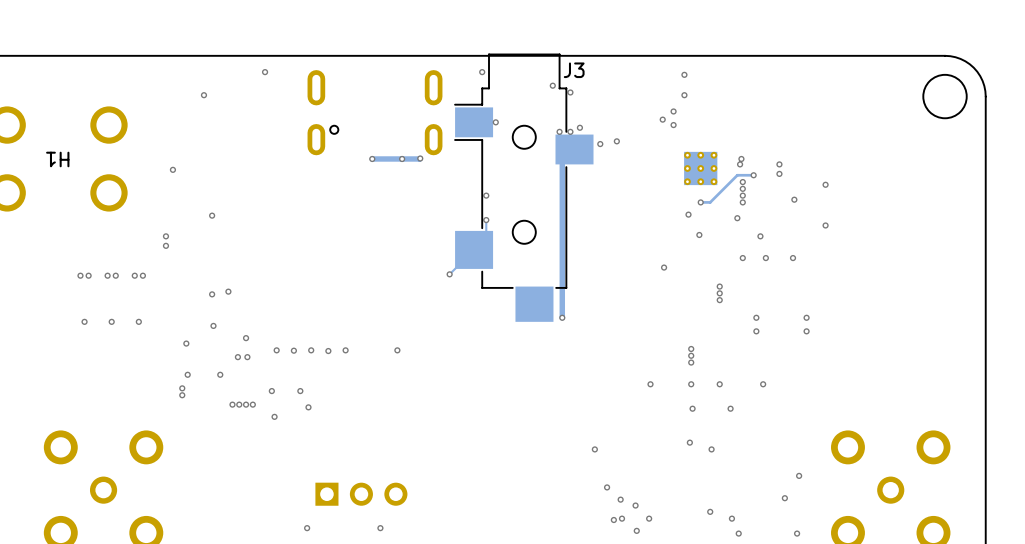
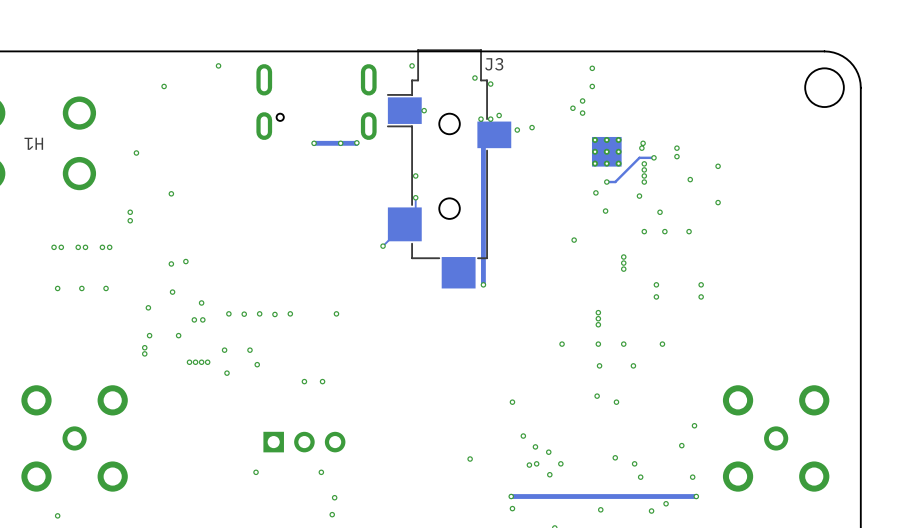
via: none -> (304, 381)
via: none -> (322, 381)
via: none -> (470, 459)

